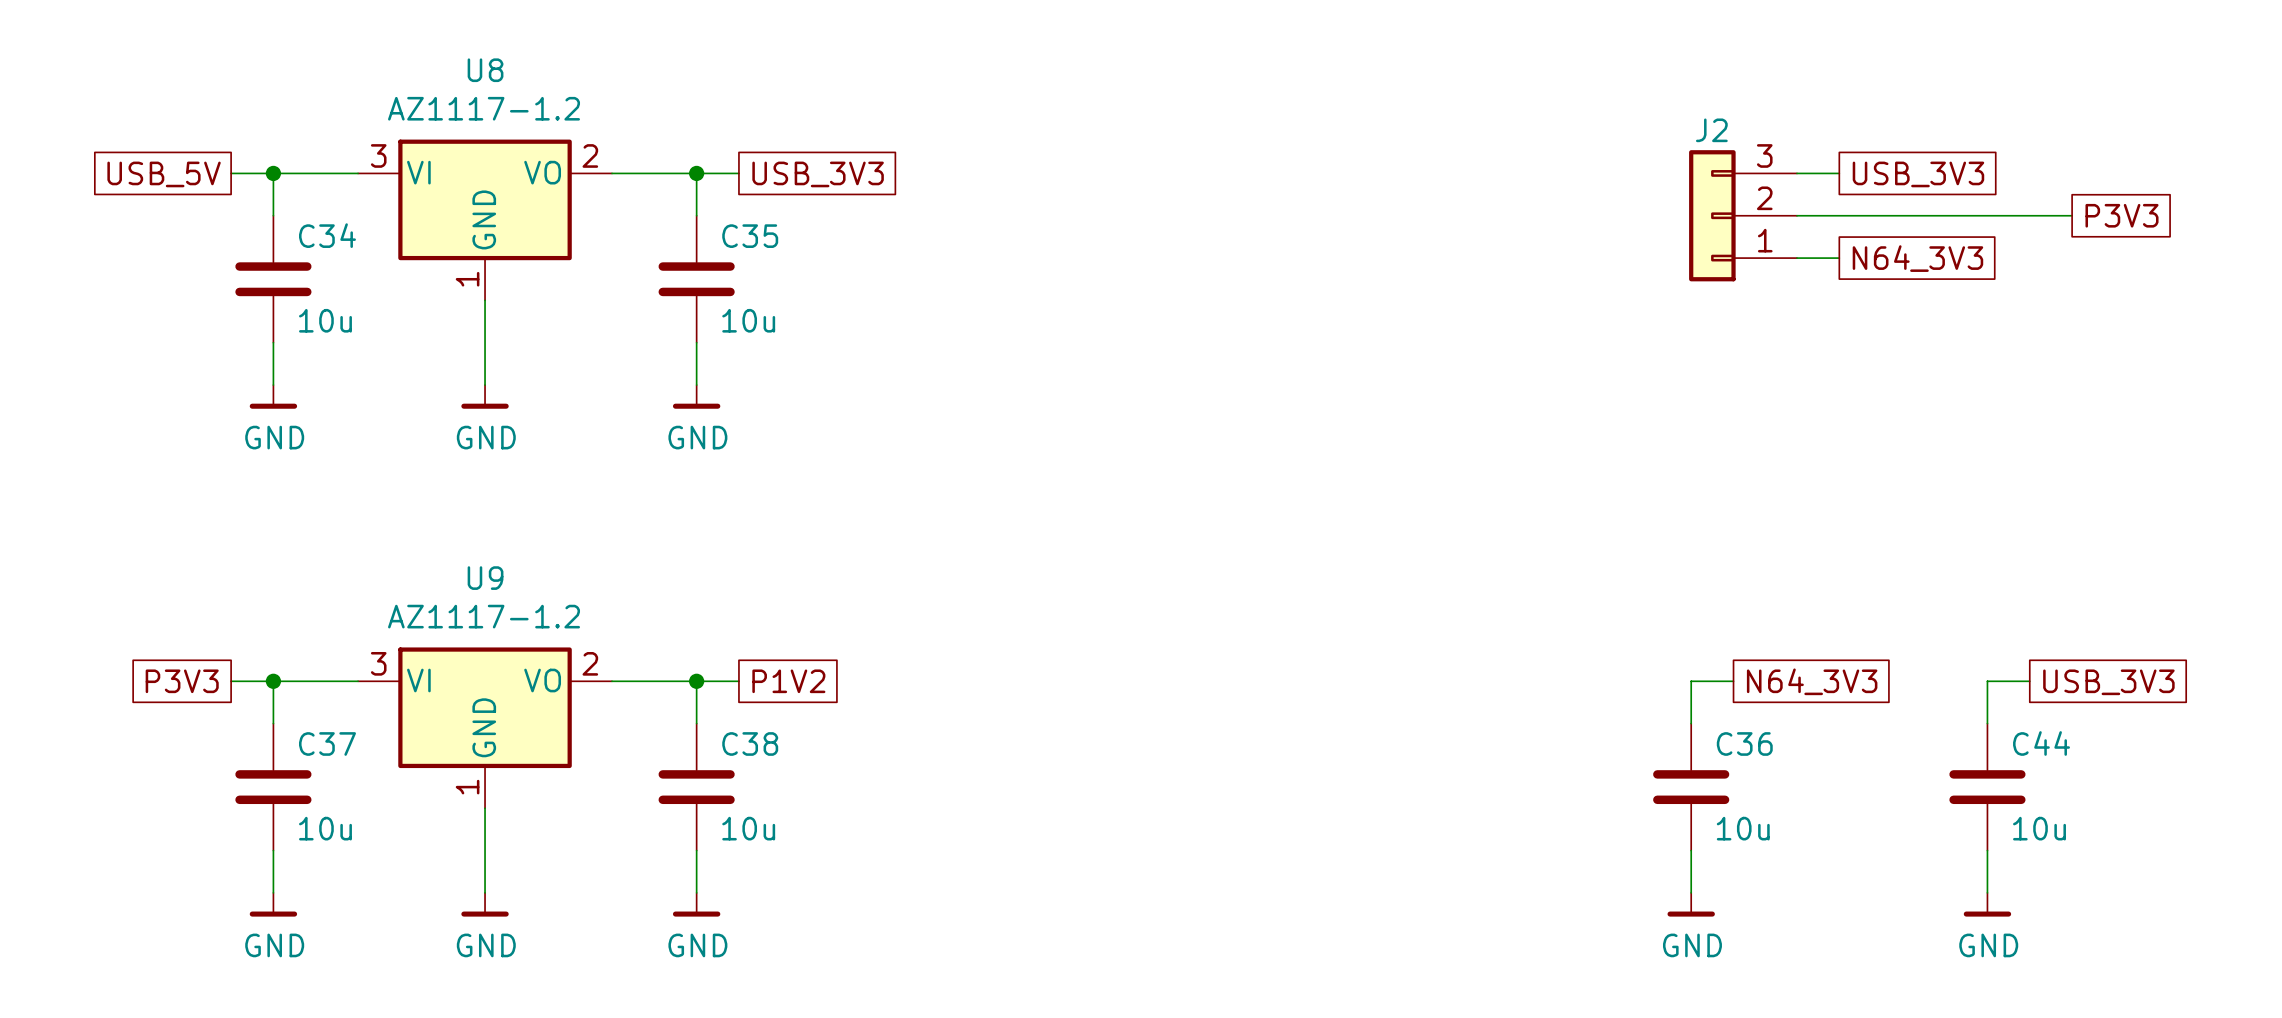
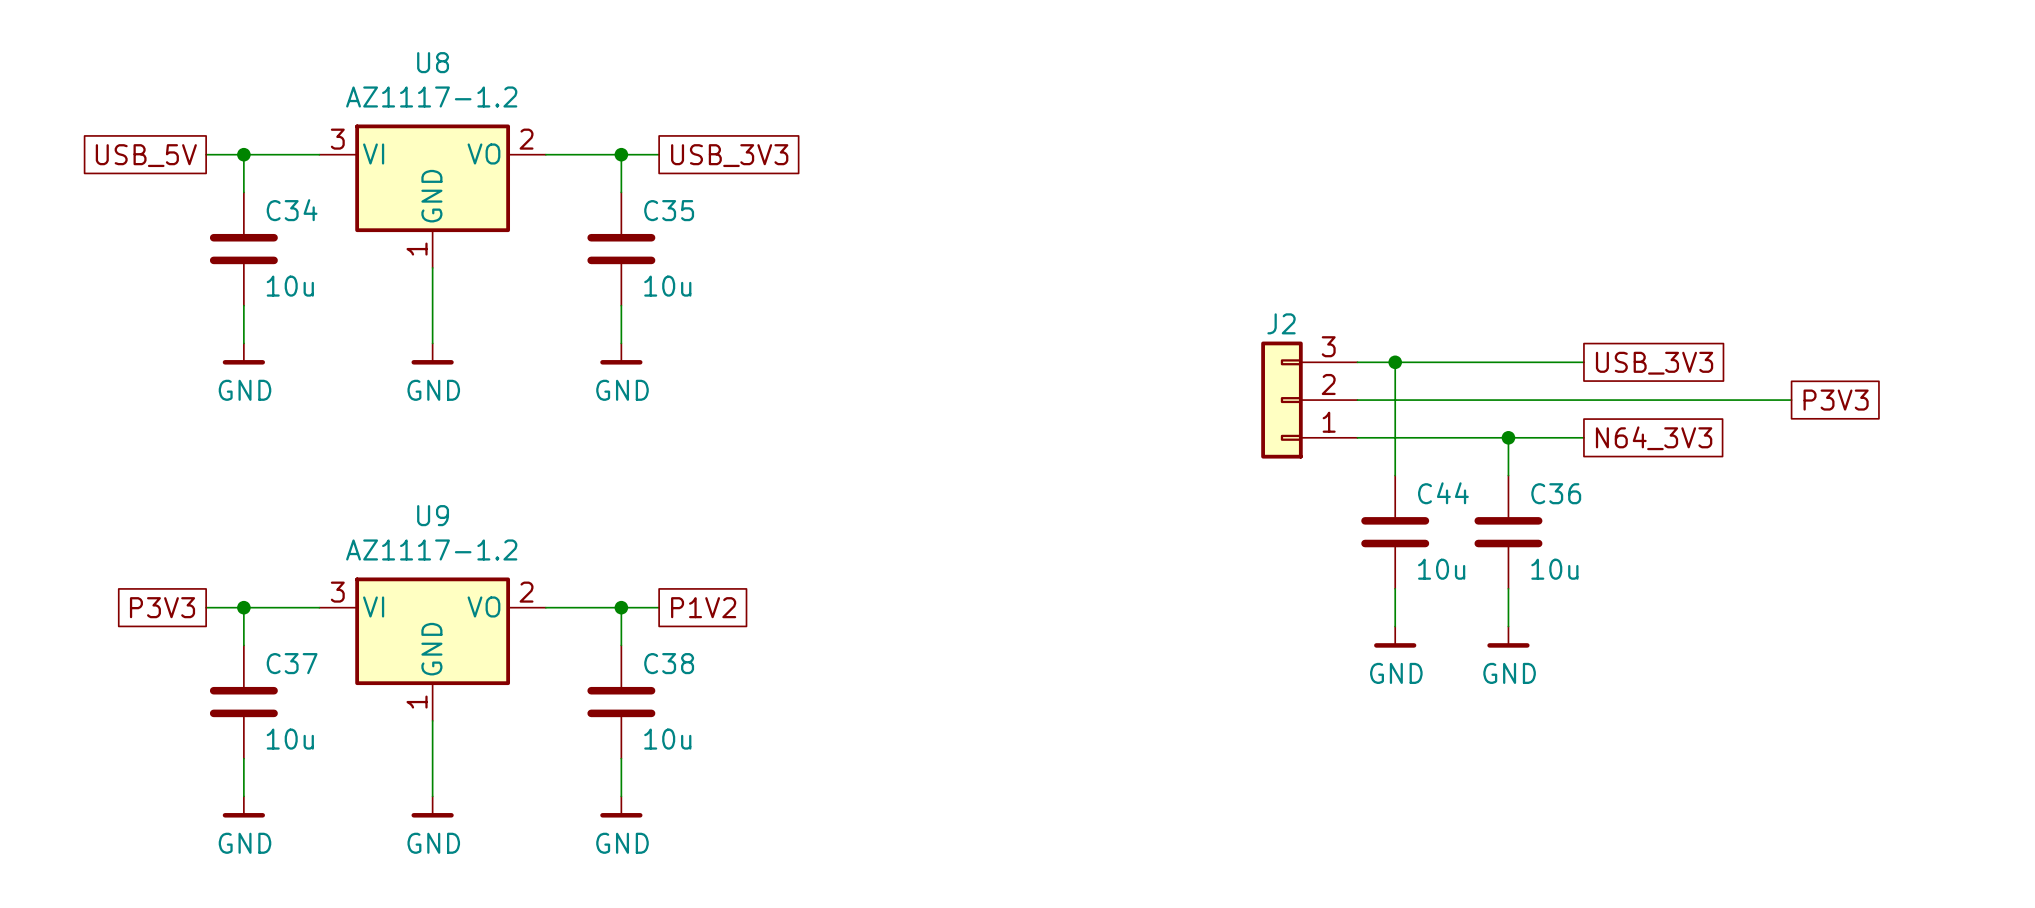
wire: (1797, 173) (1839, 173) -> none
global label: USB_3V3 (1918, 174) -> none
J2 position: (1743, 215) -> (1309, 400)
wire: (1797, 215) (2072, 215) -> none
global label position: P3V3 (2122, 215) -> P3V3 (1836, 400)
wire: (1797, 258) (1839, 258) -> none
global label: N64_3V3 (1917, 258) -> none
wire: none -> (1357, 362) (1583, 362)
wire: none -> (1395, 362) (1395, 475)
junction: none -> (1395, 362)
global label: none -> USB_3V3 (1654, 363)
wire: none -> (1357, 400) (1791, 400)
wire: none -> (1357, 437) (1583, 437)
wire: none -> (1508, 437) (1508, 475)
junction: none -> (1508, 437)
global label: none -> N64_3V3 (1654, 438)
wire: (1691, 681) (1733, 681) -> (1508, 607) (1508, 588)
global label: N64_3V3 (1812, 681) -> none
wire: (2029, 681) (1987, 681) (1987, 723) -> none
global label: USB_3V3 (2108, 682) -> none
power symbol: none -> GND (1395, 637)
power symbol: none -> GND (1508, 637)
C36 position: (1691, 787) -> (1508, 532)
C44 position: (1987, 787) -> (1395, 532)
wire: (1691, 850) (1691, 892) -> (1395, 588) (1395, 626)
wire: (1987, 850) (1987, 892) -> none
power symbol: GND (1691, 904) -> none
power symbol: GND (1987, 904) -> none

